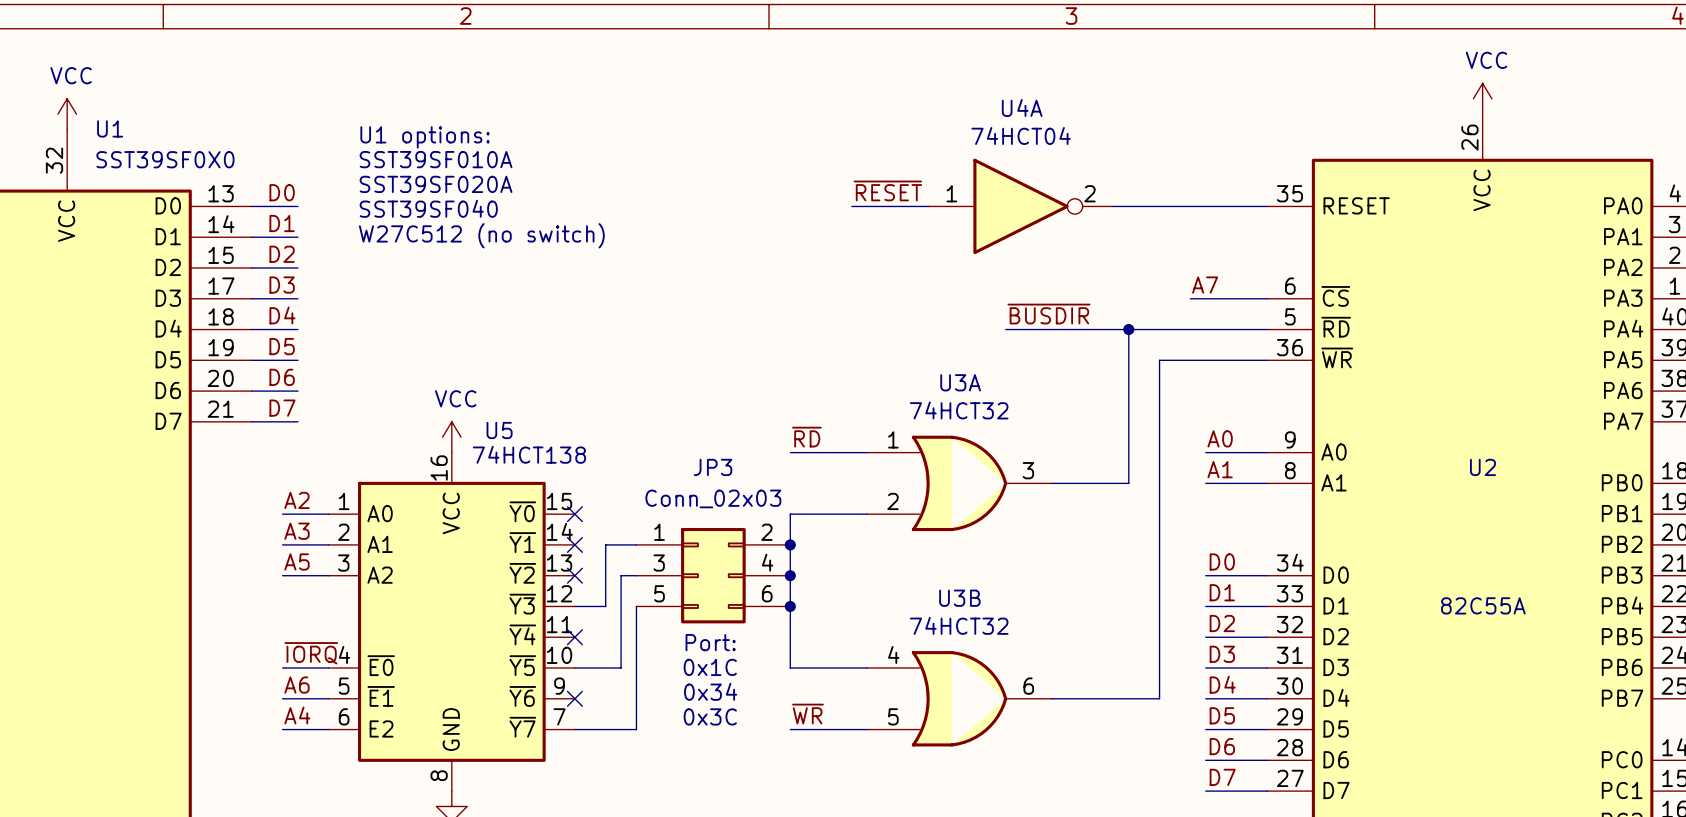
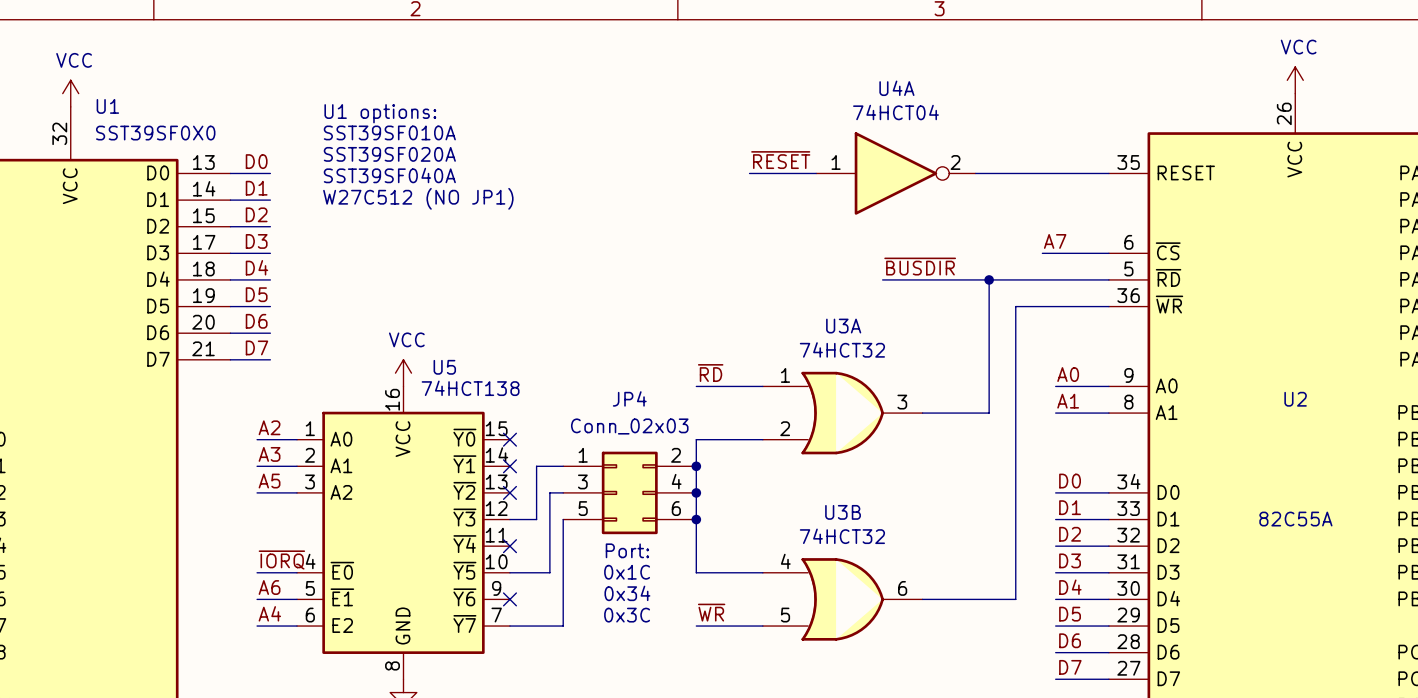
text: SST39SF040 (428, 208) -> SST39SF040A (389, 175)
text: W27C512 (no switch) (481, 235) -> W27C512 (NO JP1) (418, 198)
JP3 name: JP3 (713, 467) -> JP4 (629, 398)

